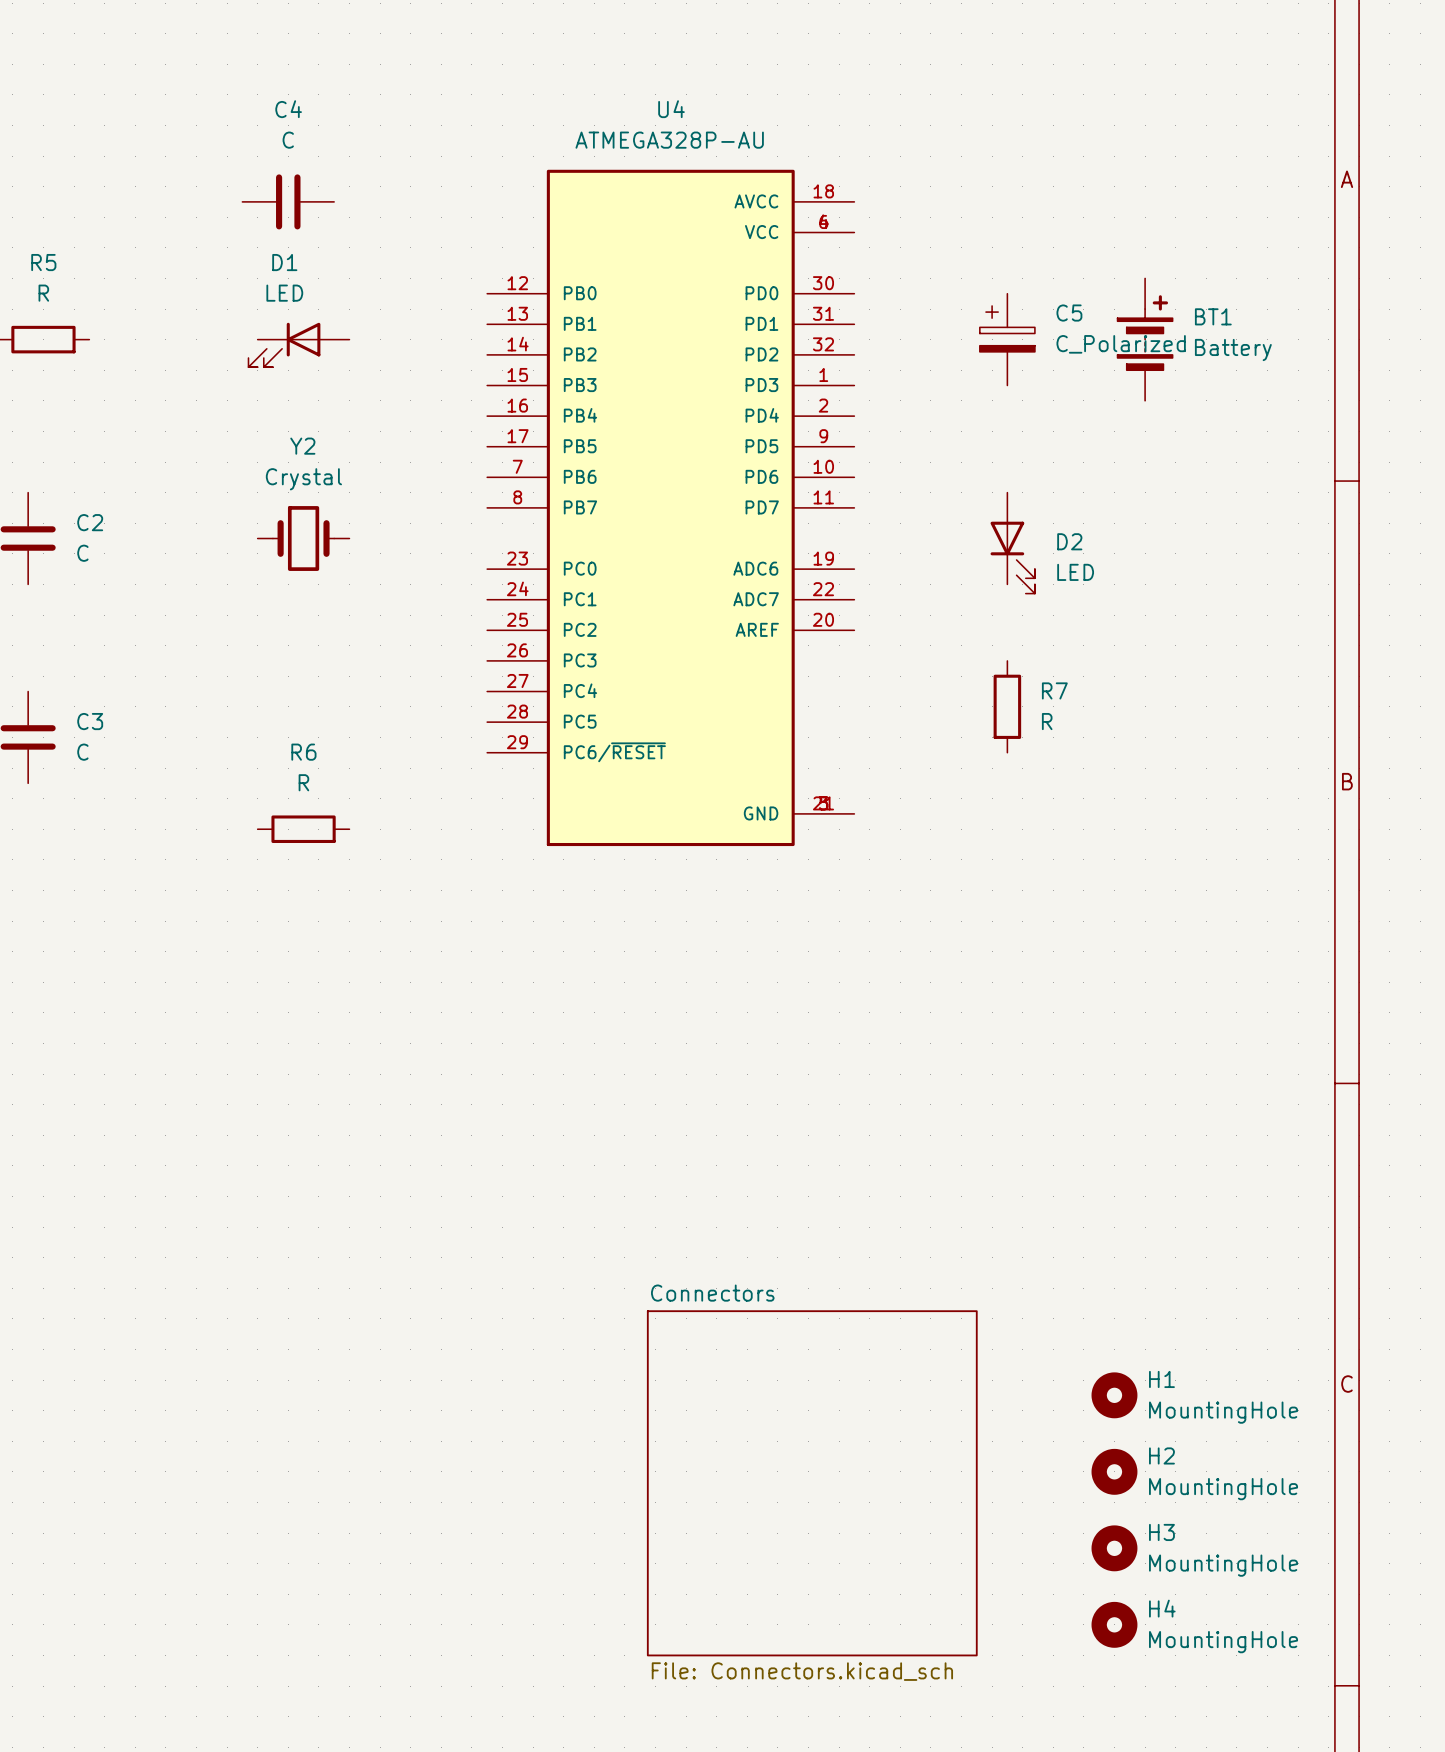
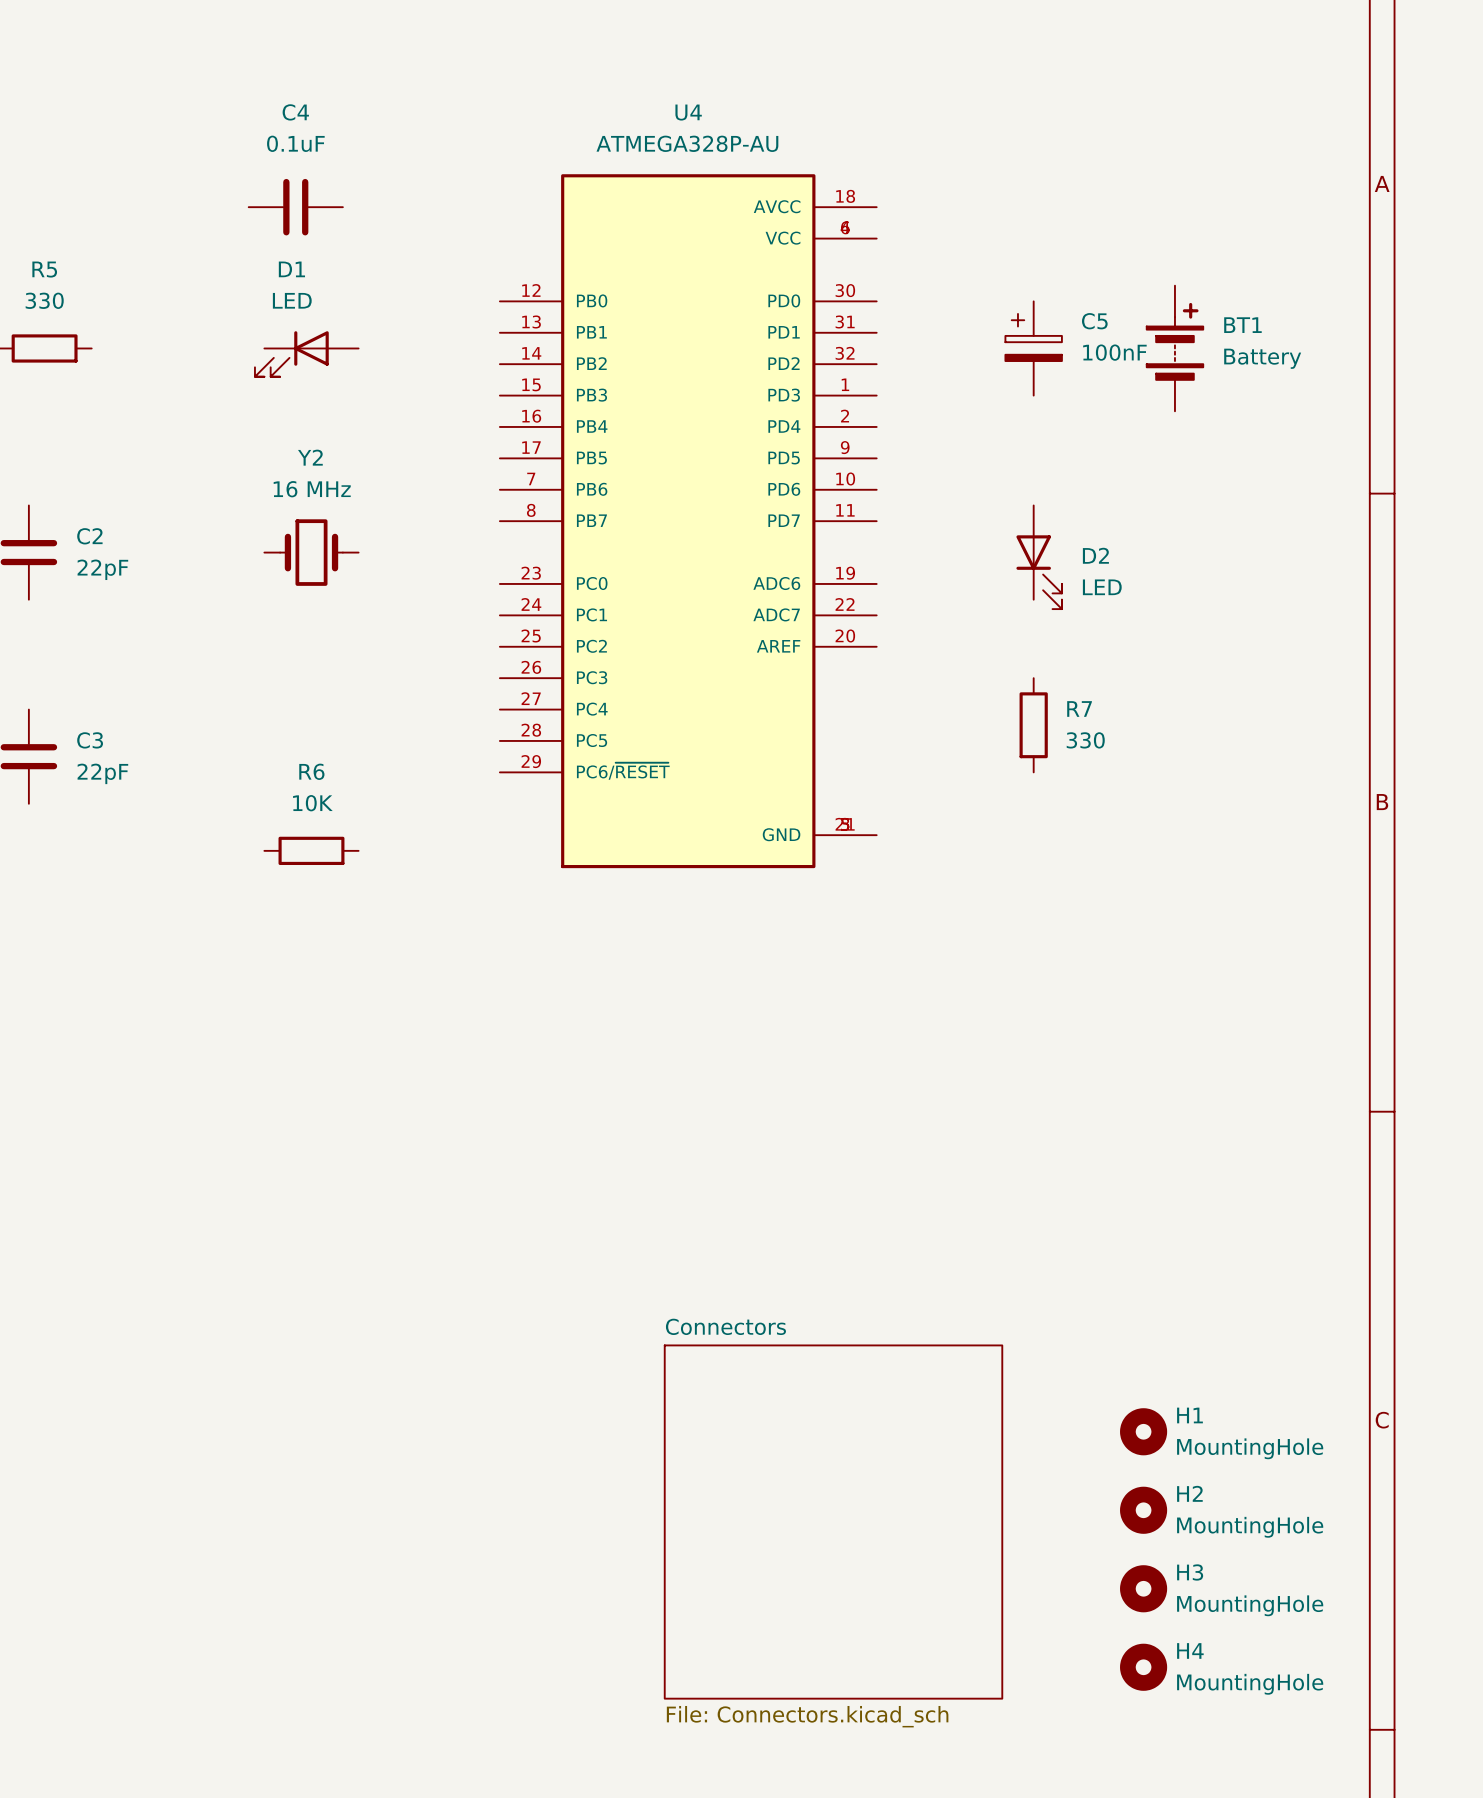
C4 value: C (288, 140) -> 0.1uF (295, 143)
R5 value: R (43, 293) -> 330 (44, 300)
C5 value: C_Polarized (1121, 344) -> 100nF (1114, 352)
Y2 value: Crystal (303, 479) -> 16 MHz (312, 489)
C2 value: C (82, 553) -> 22pF (102, 569)
R7 value: R (1047, 721) -> 330 (1085, 740)
C3 value: C (82, 752) -> 22pF (102, 773)
R6 value: R (303, 782) -> 10K (312, 803)

